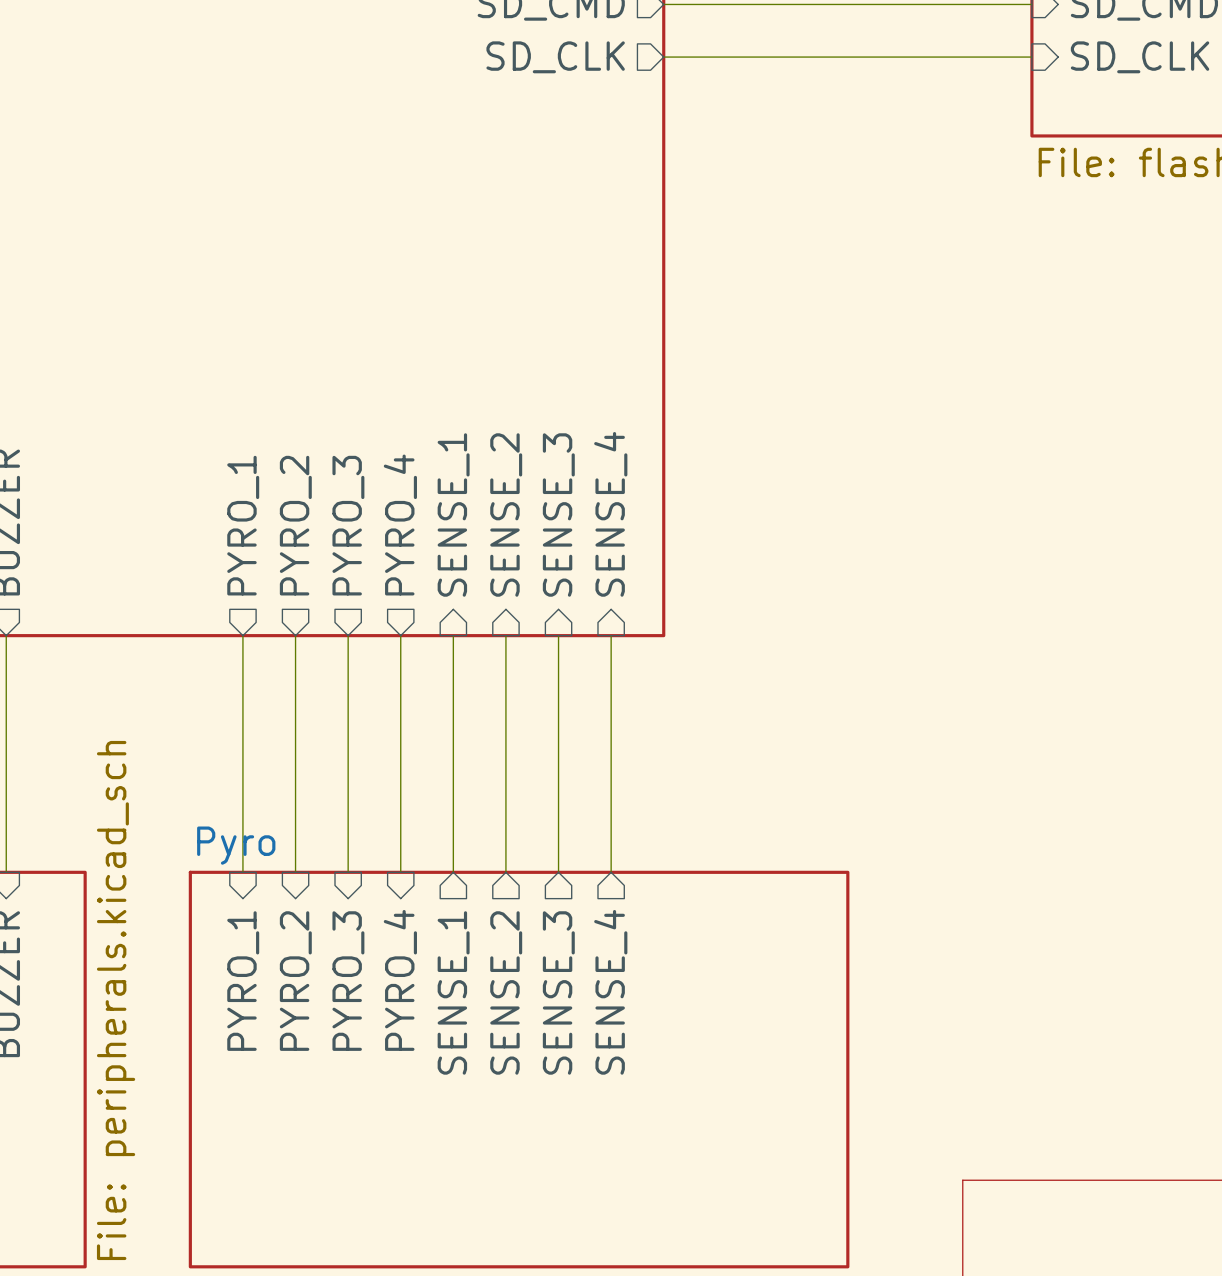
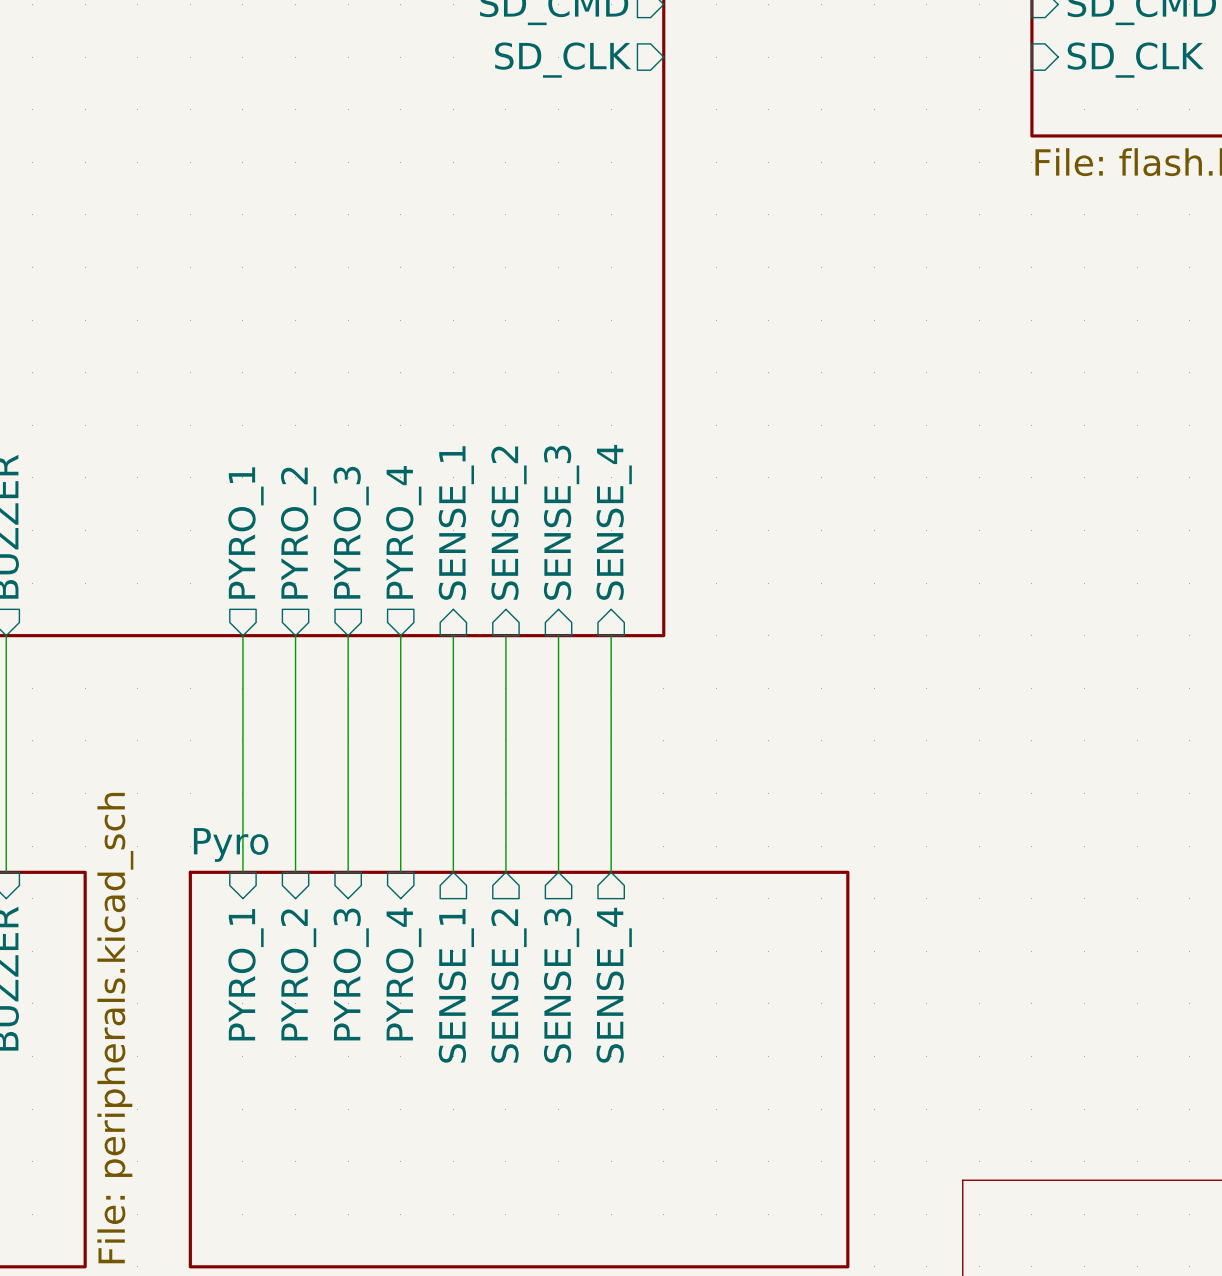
wire: (663, 4) (1031, 4) -> none
wire: (663, 57) (1031, 57) -> none

